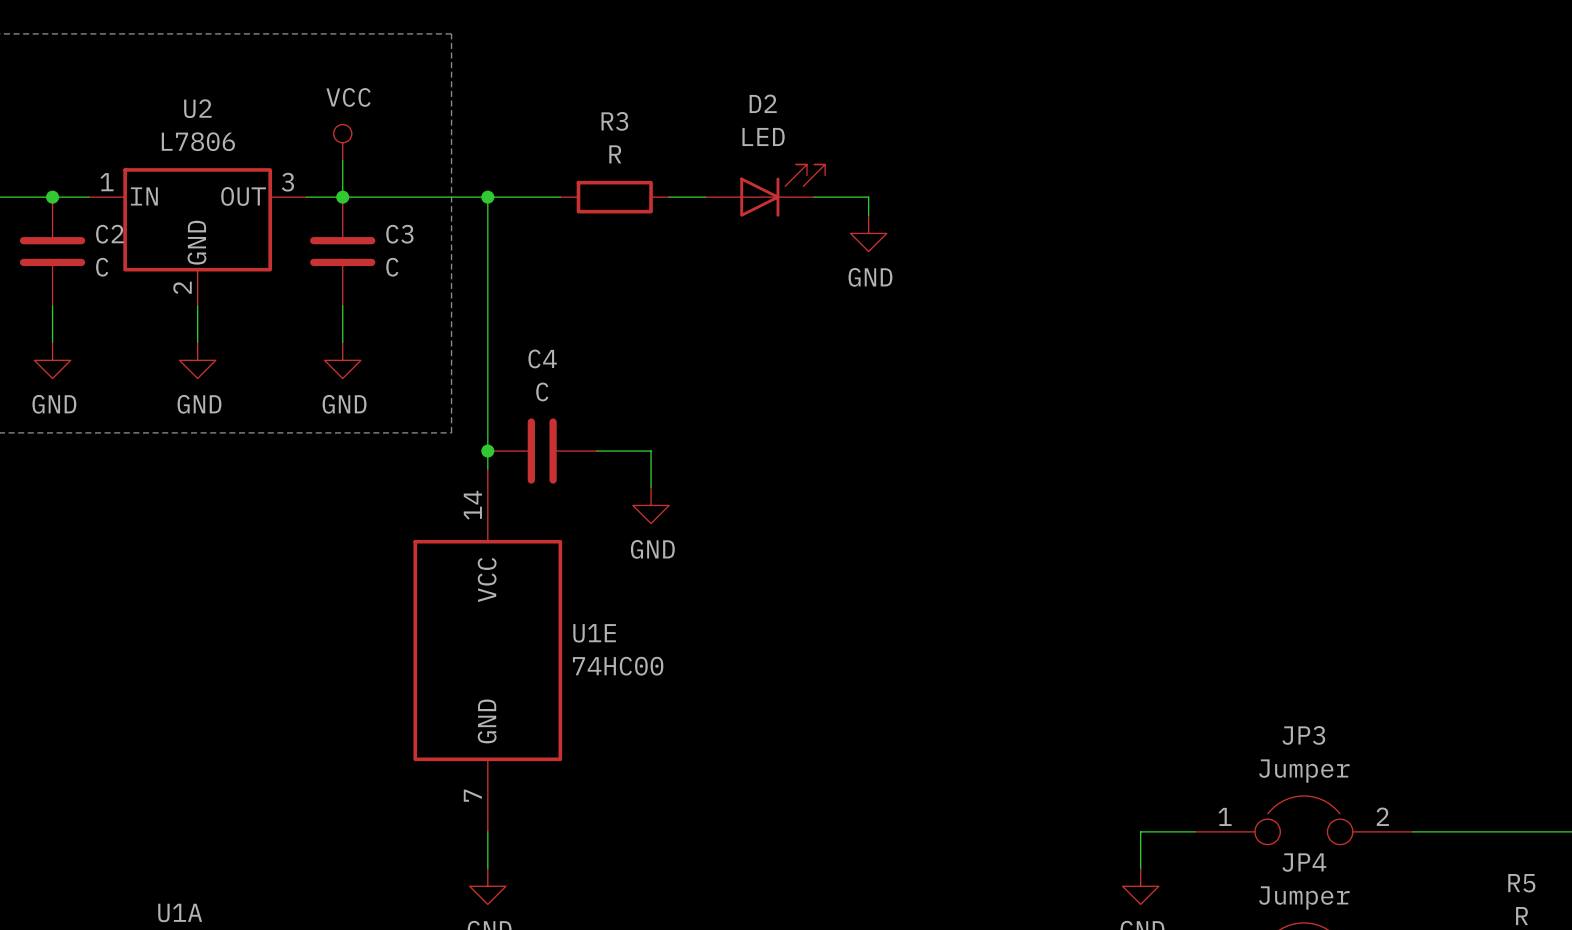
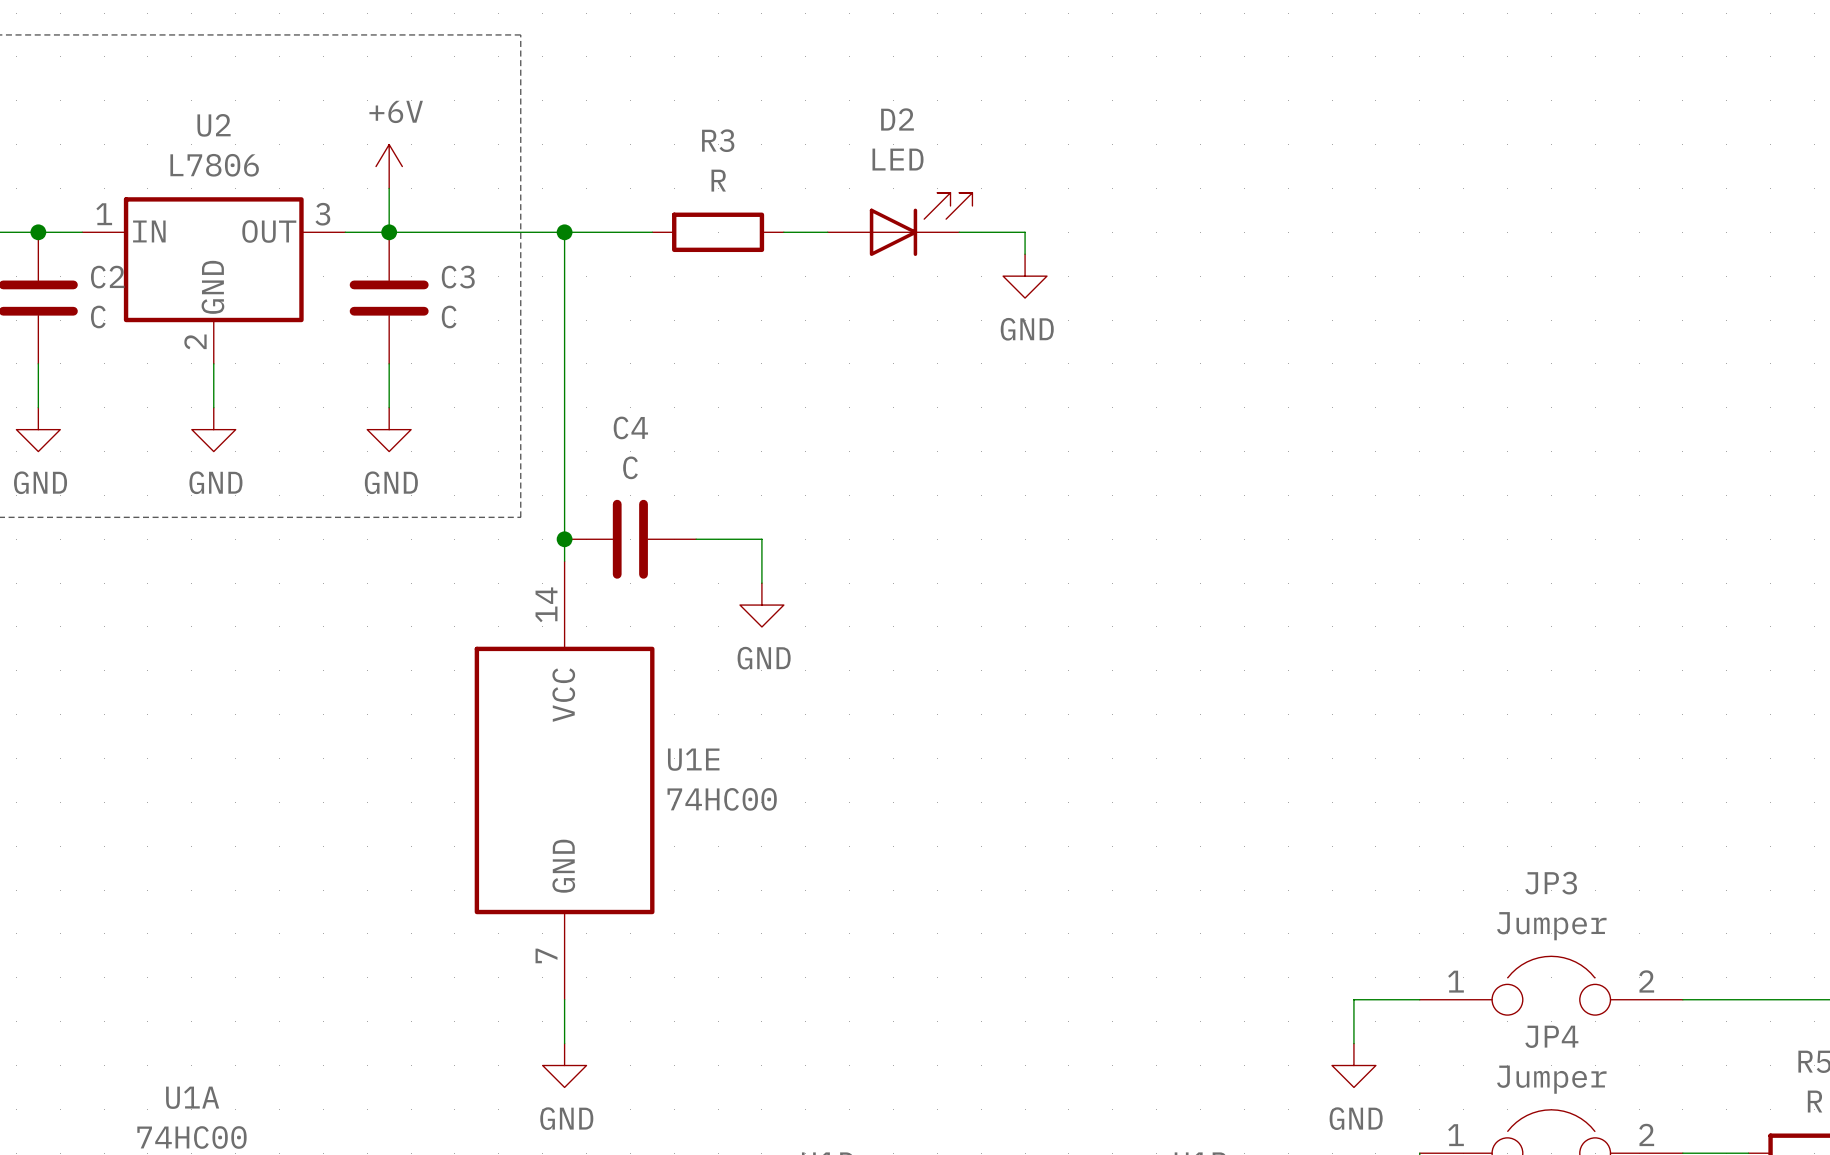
power symbol: VCC (342, 142) -> +6V (389, 166)

